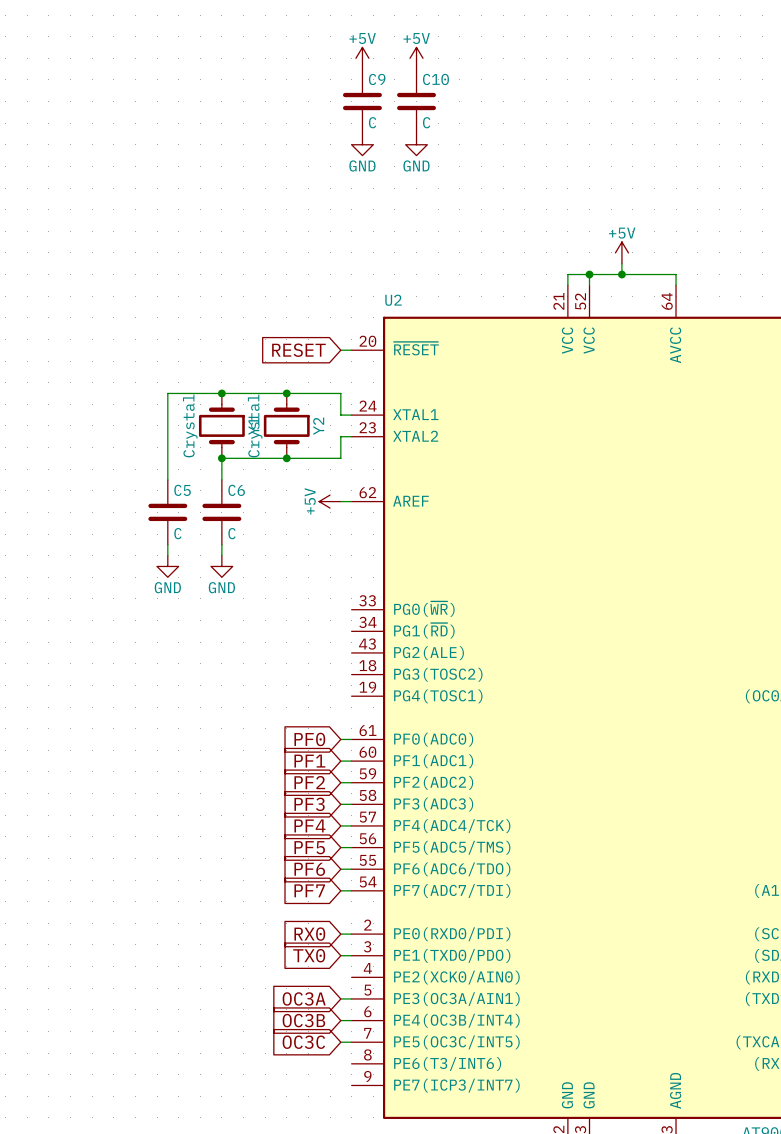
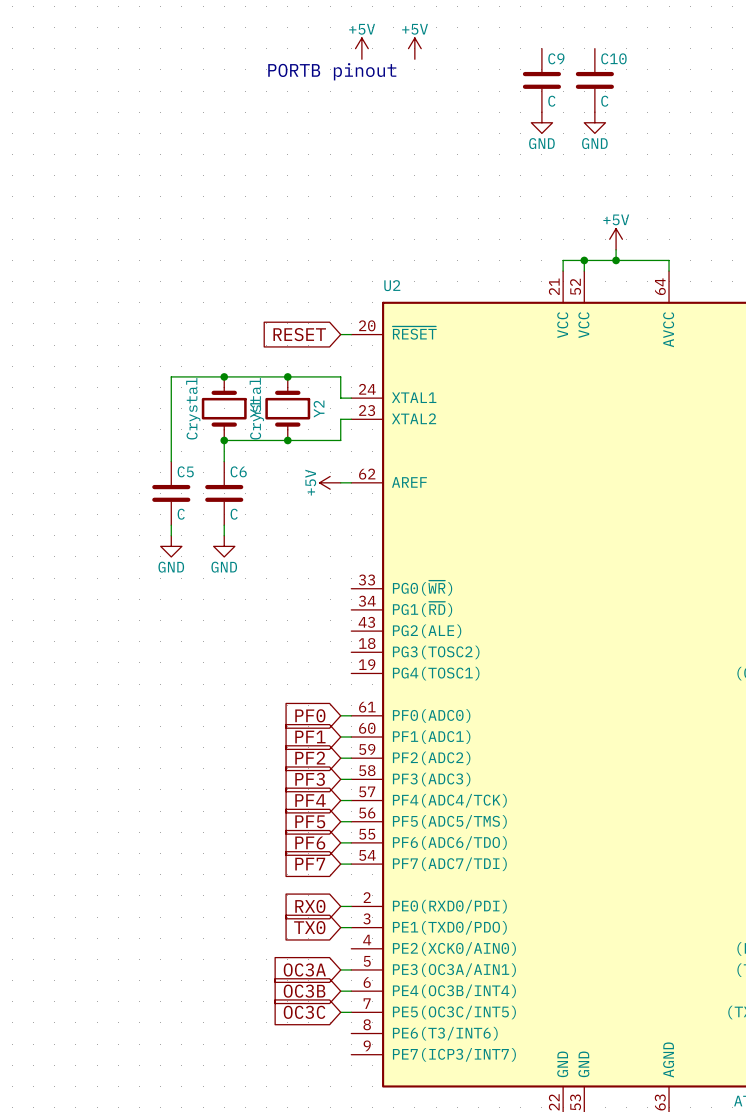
text: none -> PORTB pinout (332, 71)
C9 position: (362, 101) -> (541, 80)
C10 position: (416, 101) -> (594, 80)
power symbol: none -> GND (541, 122)
power symbol: none -> GND (594, 122)
power symbol: GND (362, 144) -> none
power symbol: GND (416, 144) -> none

